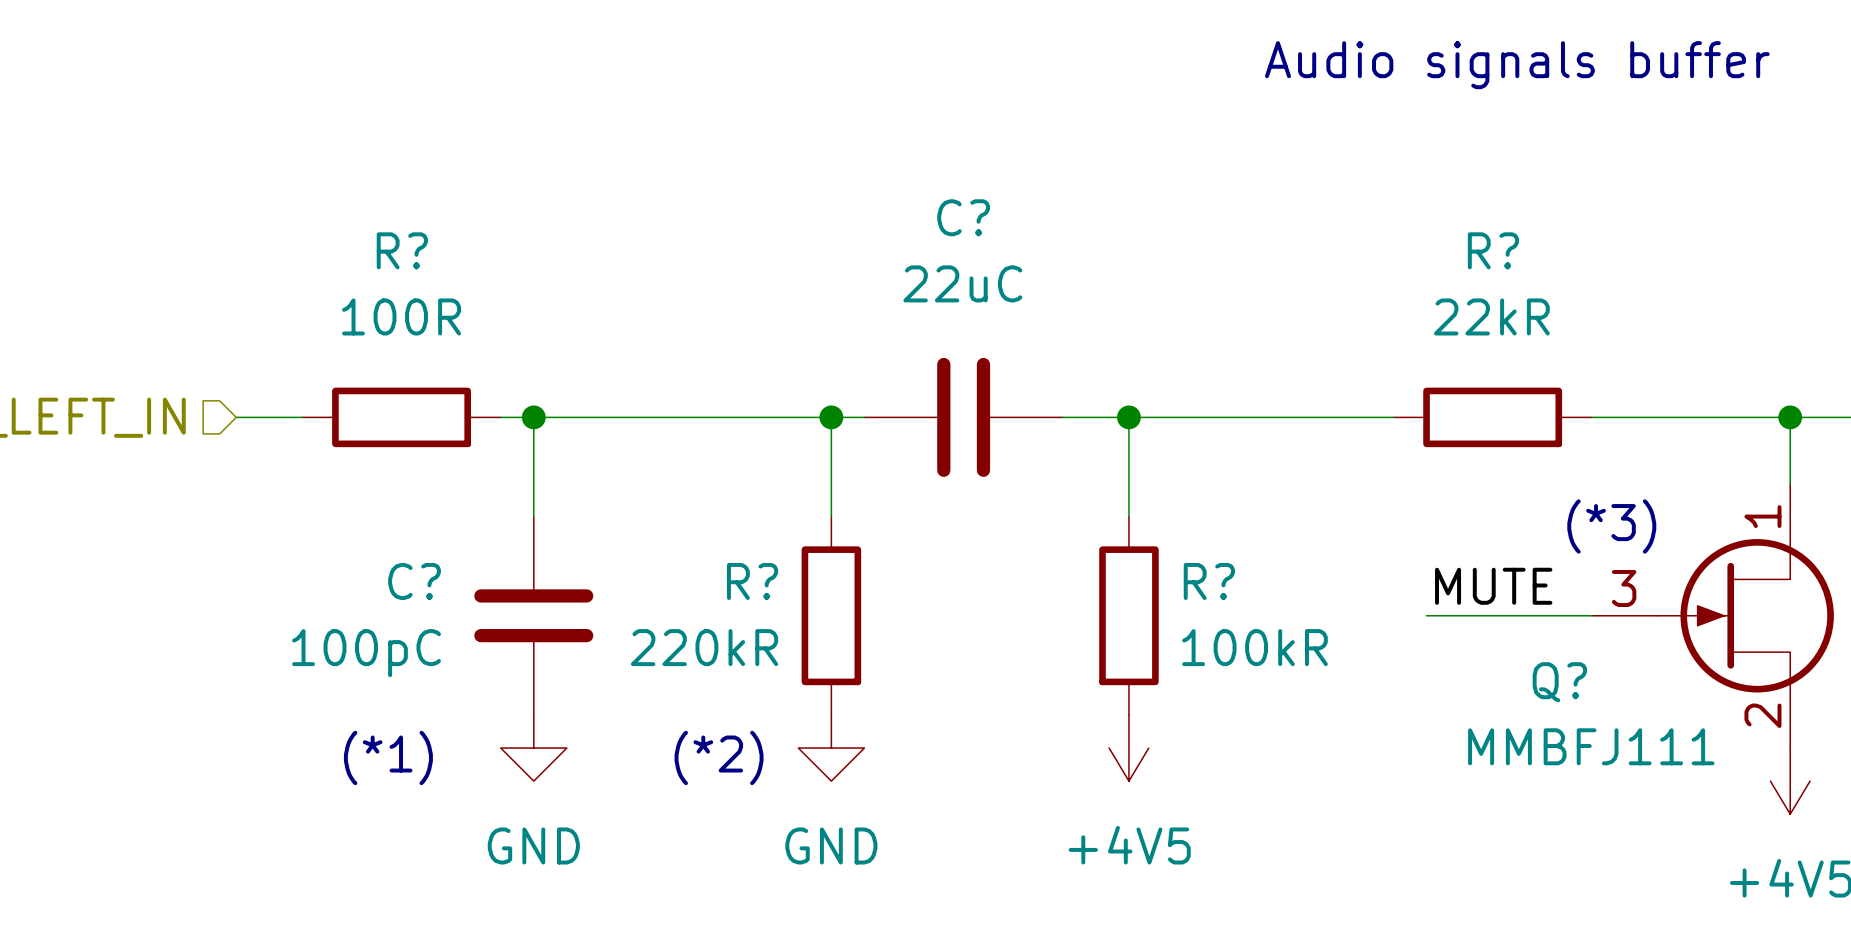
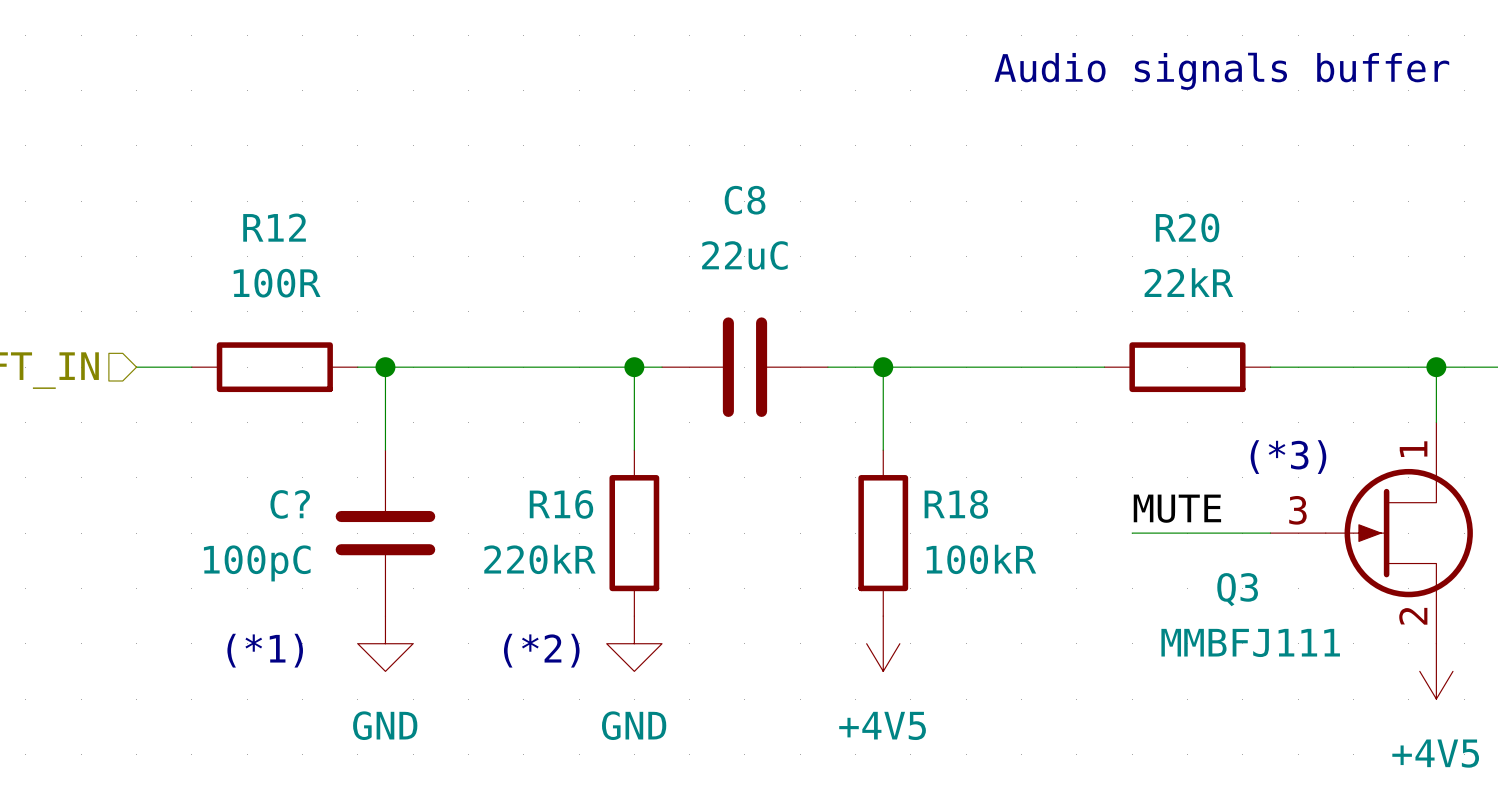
C? name: C? (963, 217) -> C8 (745, 200)
R? name: R? (402, 250) -> R12 (274, 227)
R? name: R? (1493, 250) -> R20 (1187, 227)
R? name: R? (752, 581) -> R16 (561, 504)
R? name: R? (1209, 581) -> R18 (956, 504)
Q? name: Q? (1559, 682) -> Q3 (1237, 589)

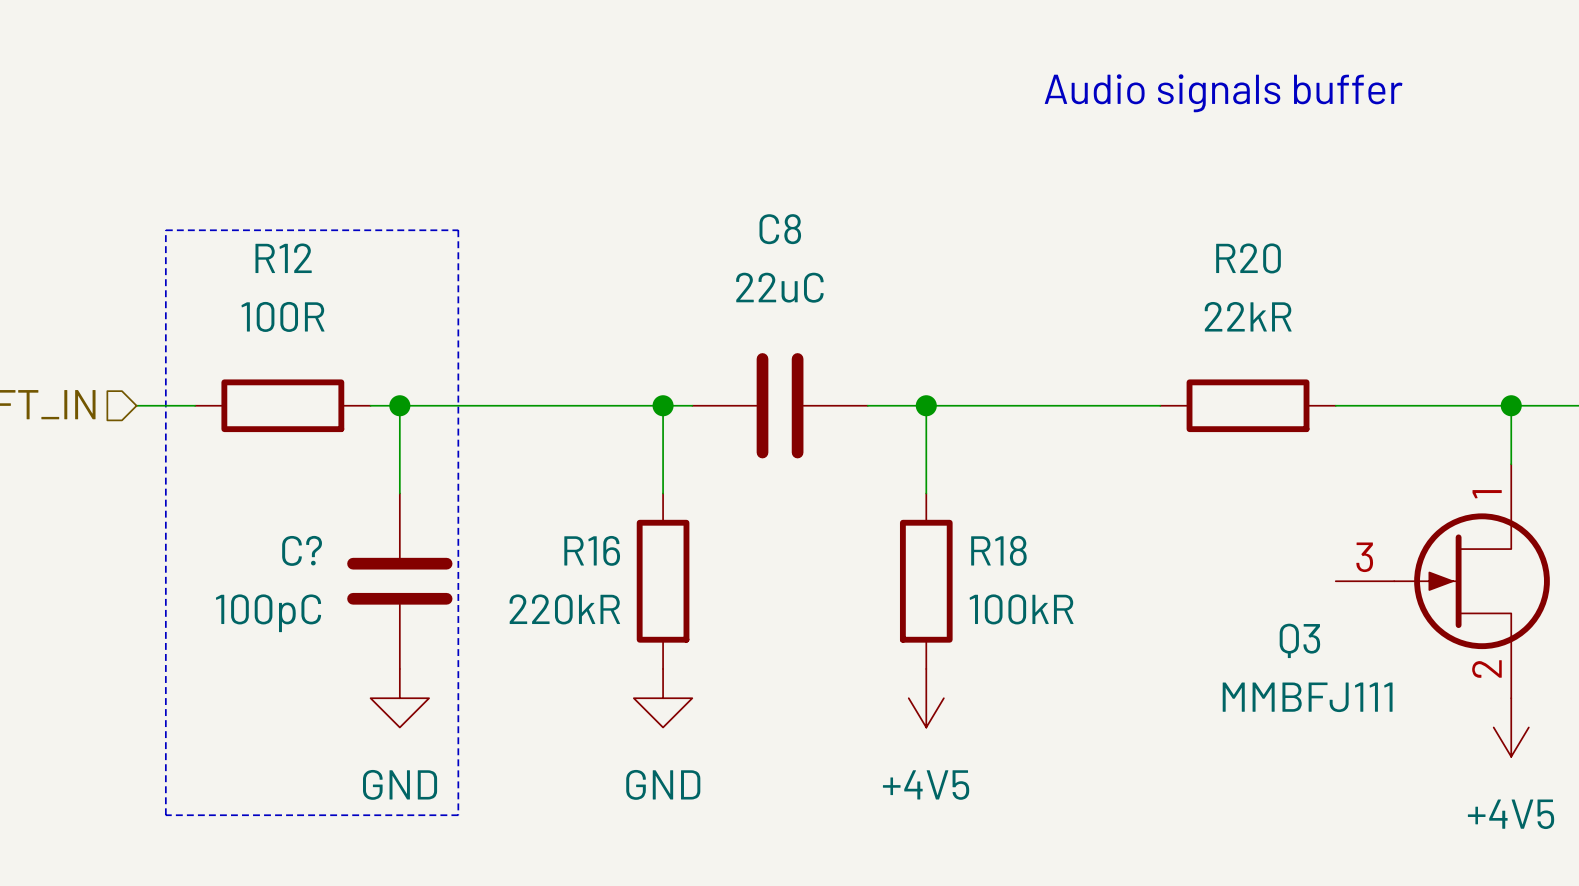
line: none -> (165, 230) (458, 230) (458, 815) (165, 815) (165, 230)
text: (*3) (1288, 457) -> none
label: MUTE (1177, 508) -> none
wire: (1132, 533) (1270, 533) -> none
text: (*1) (265, 650) -> none
text: (*2) (541, 650) -> none

